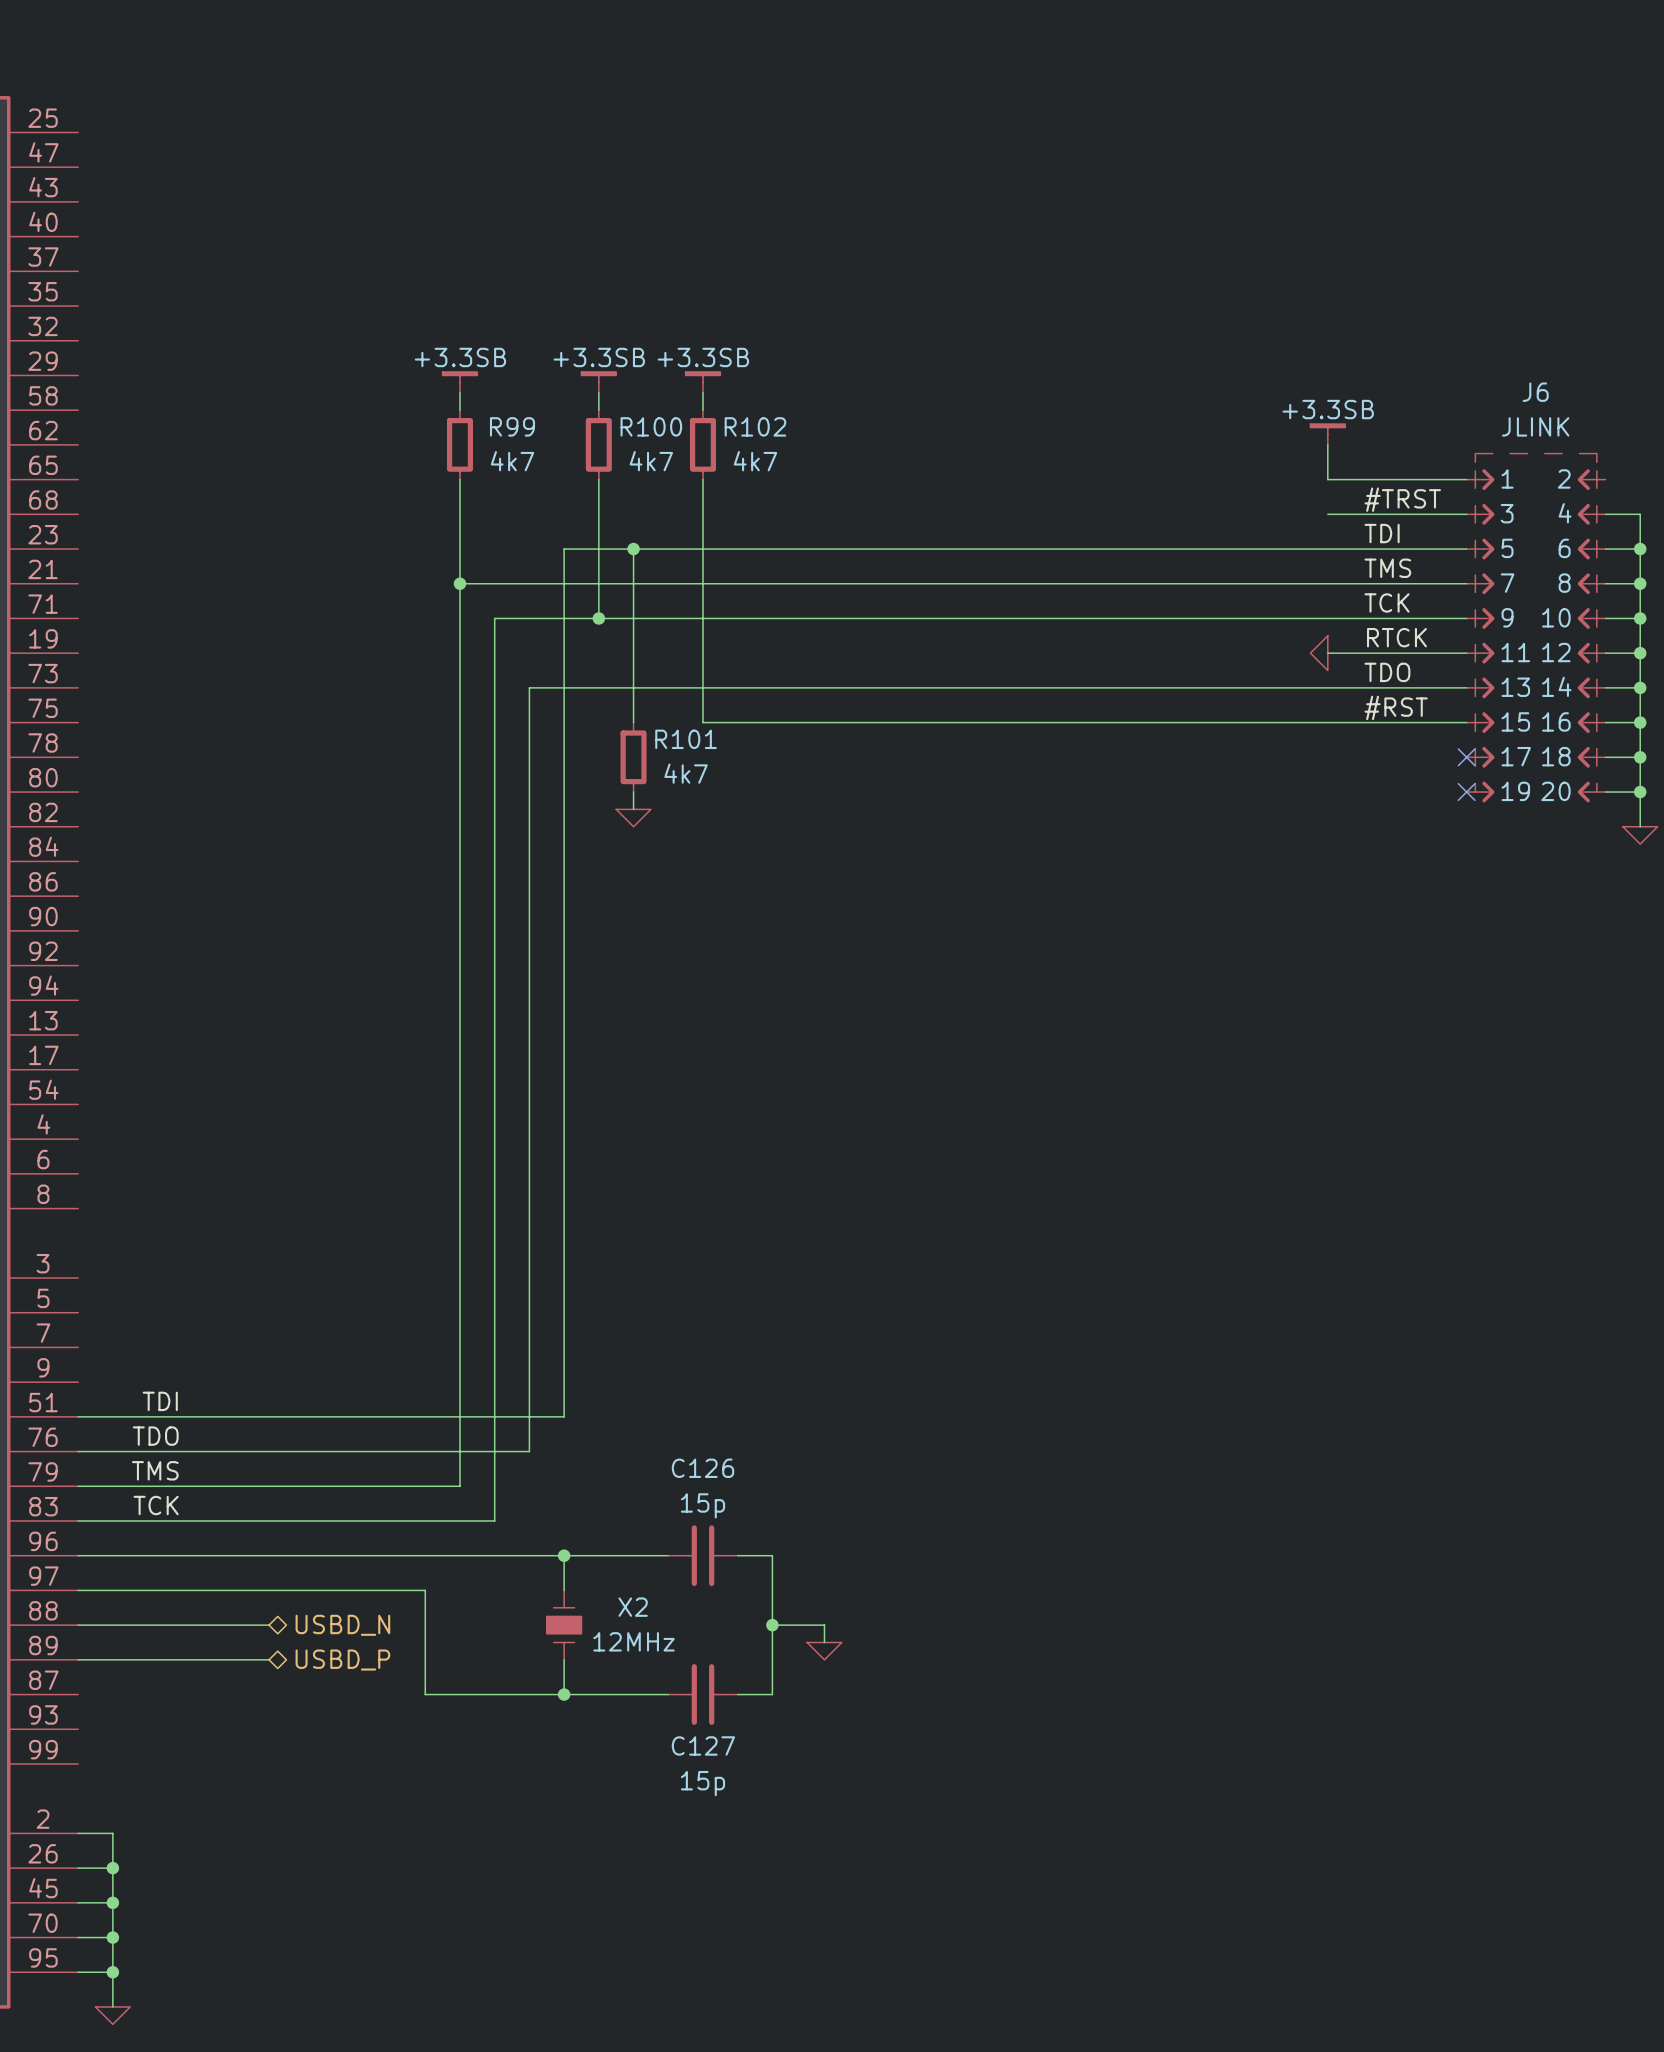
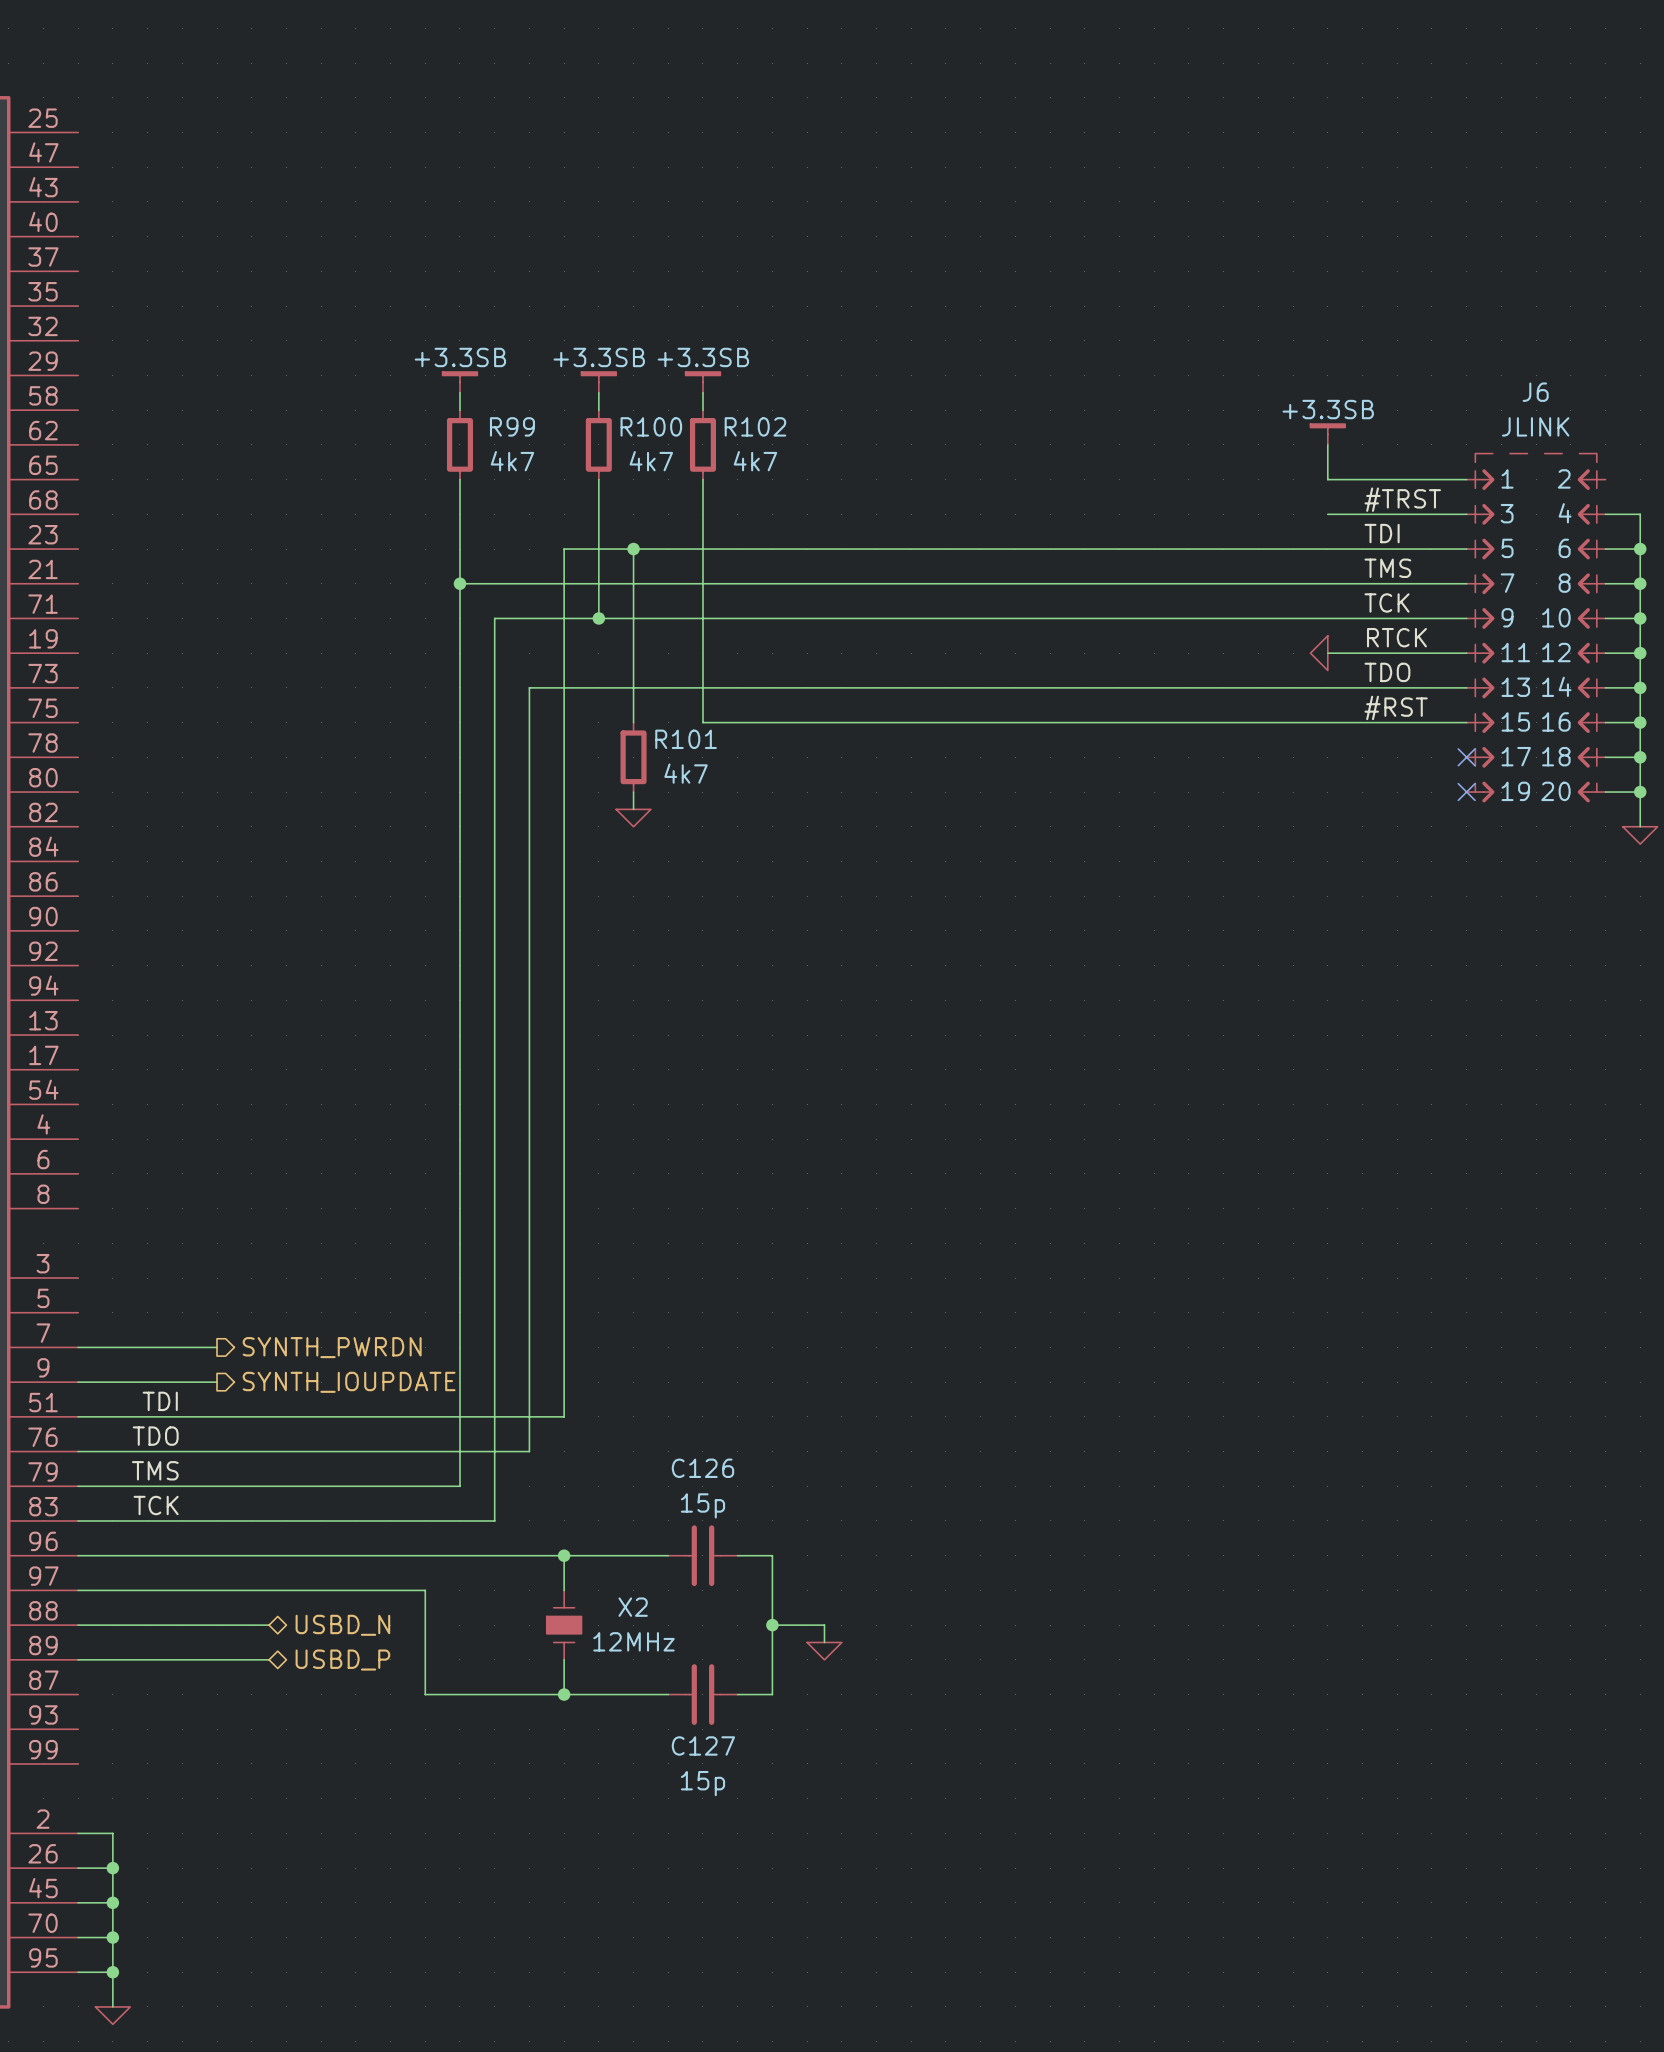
wire: none -> (78, 1347) (217, 1347)
hierarchical label: none -> SYNTH_PWRDN (332, 1347)
wire: none -> (78, 1382) (217, 1382)
hierarchical label: none -> SYNTH_IOUPDATE (349, 1382)

